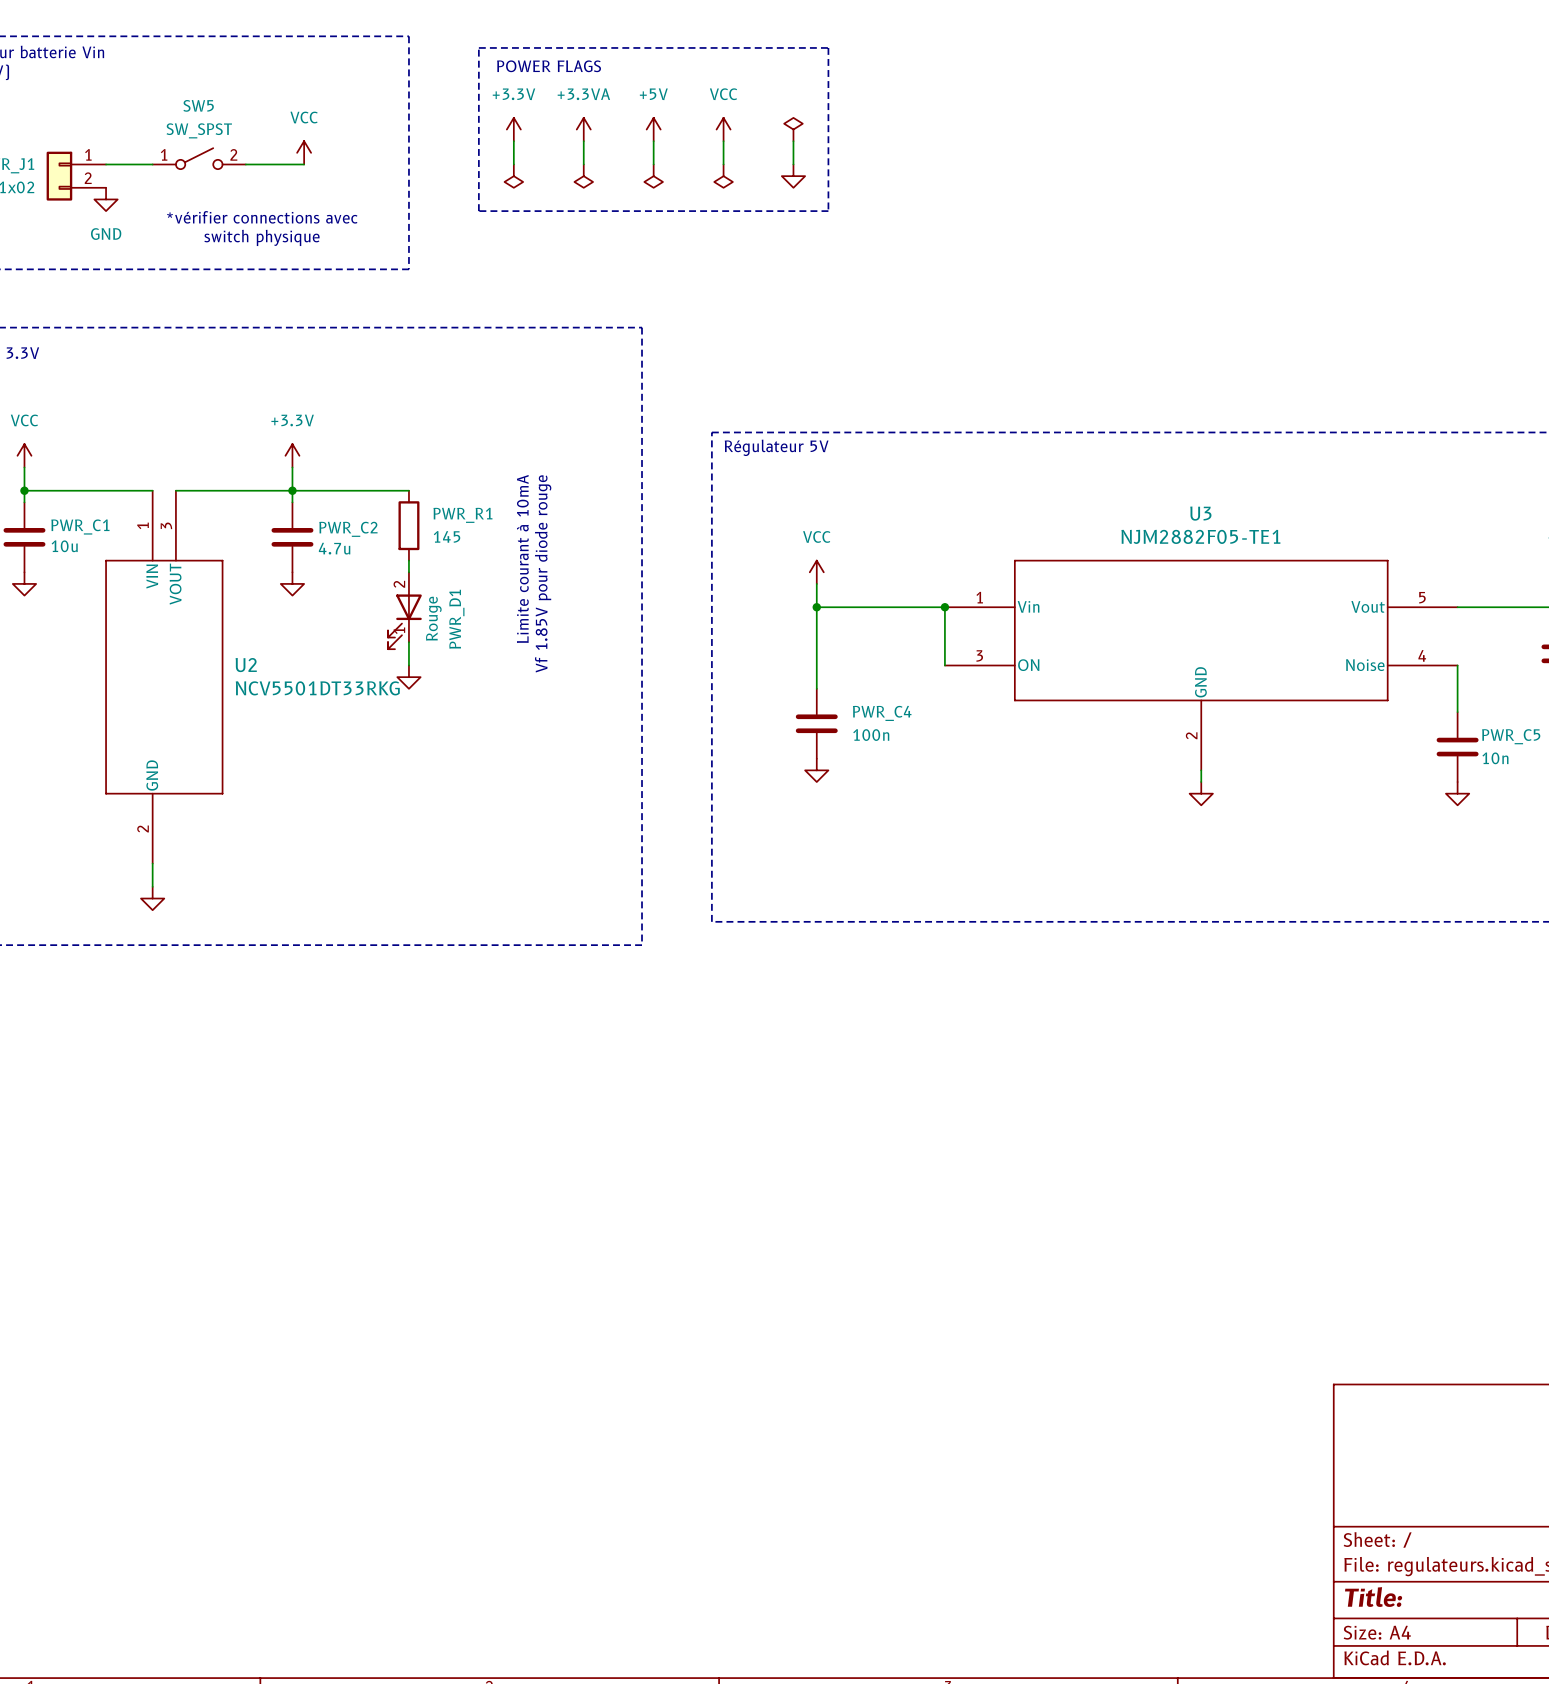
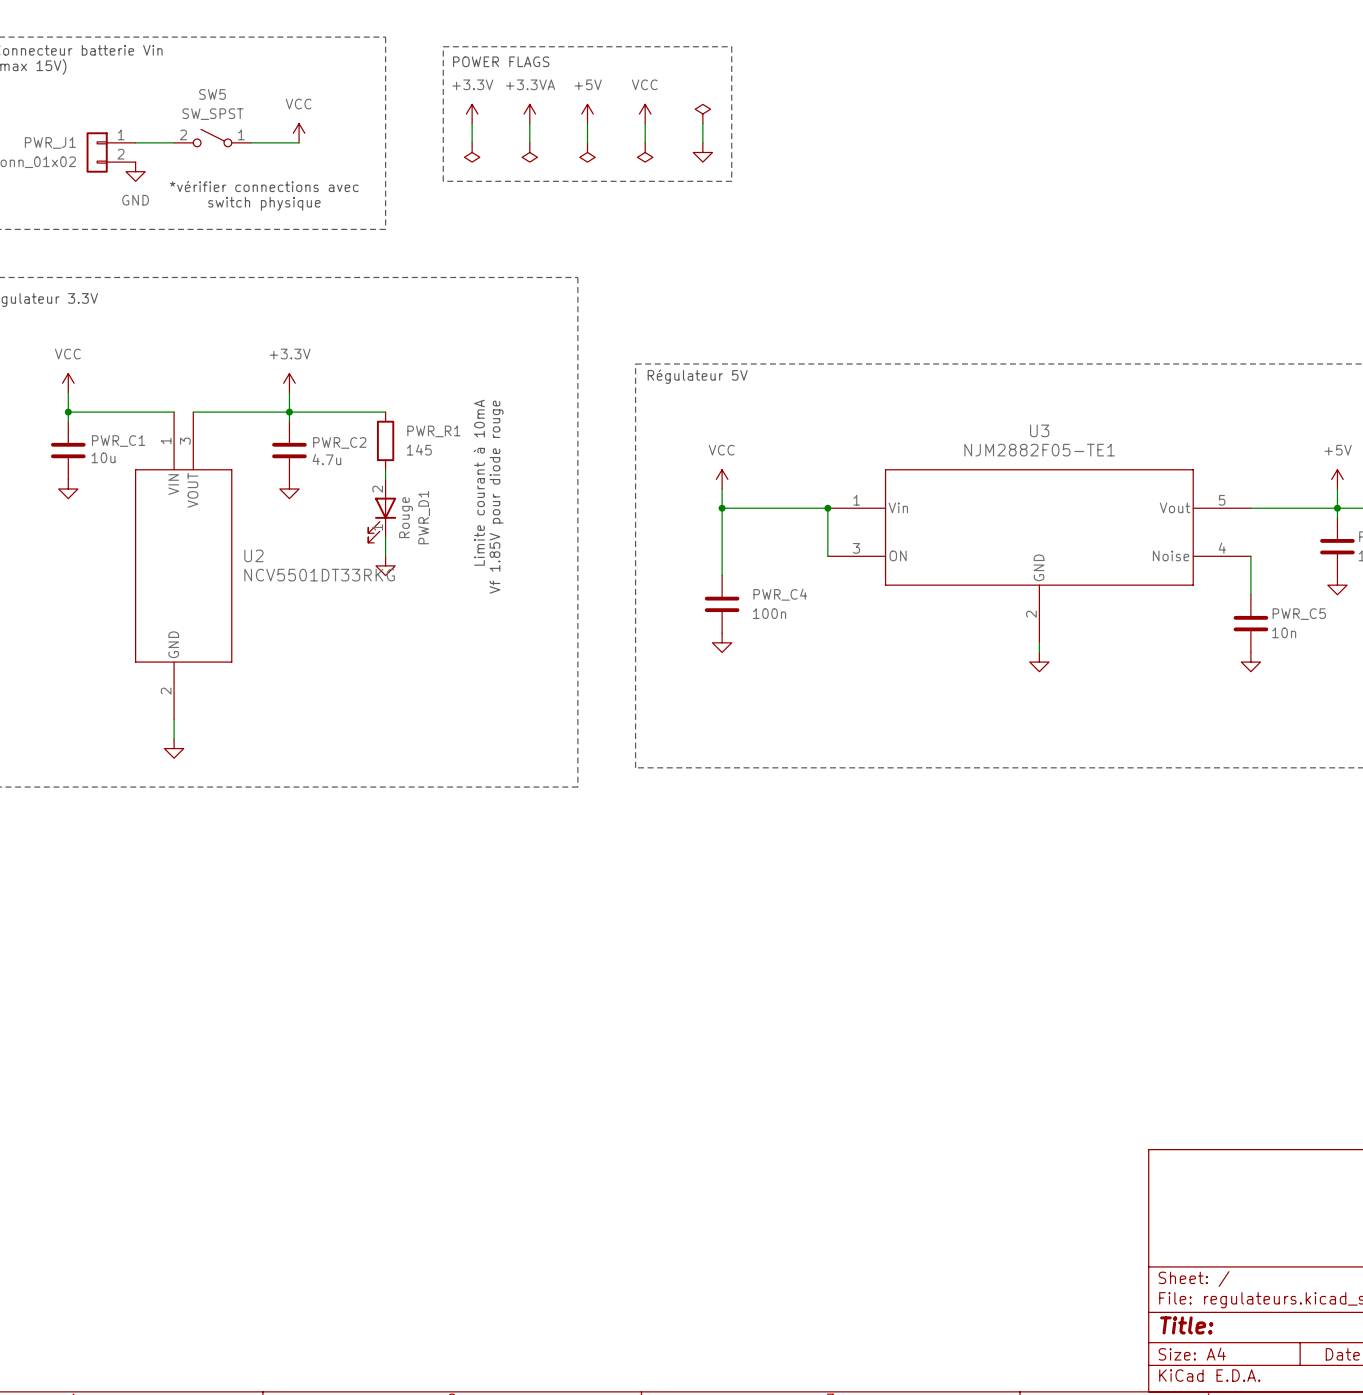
SW5 flip: as is (199, 158) -> left-right (212, 138)

